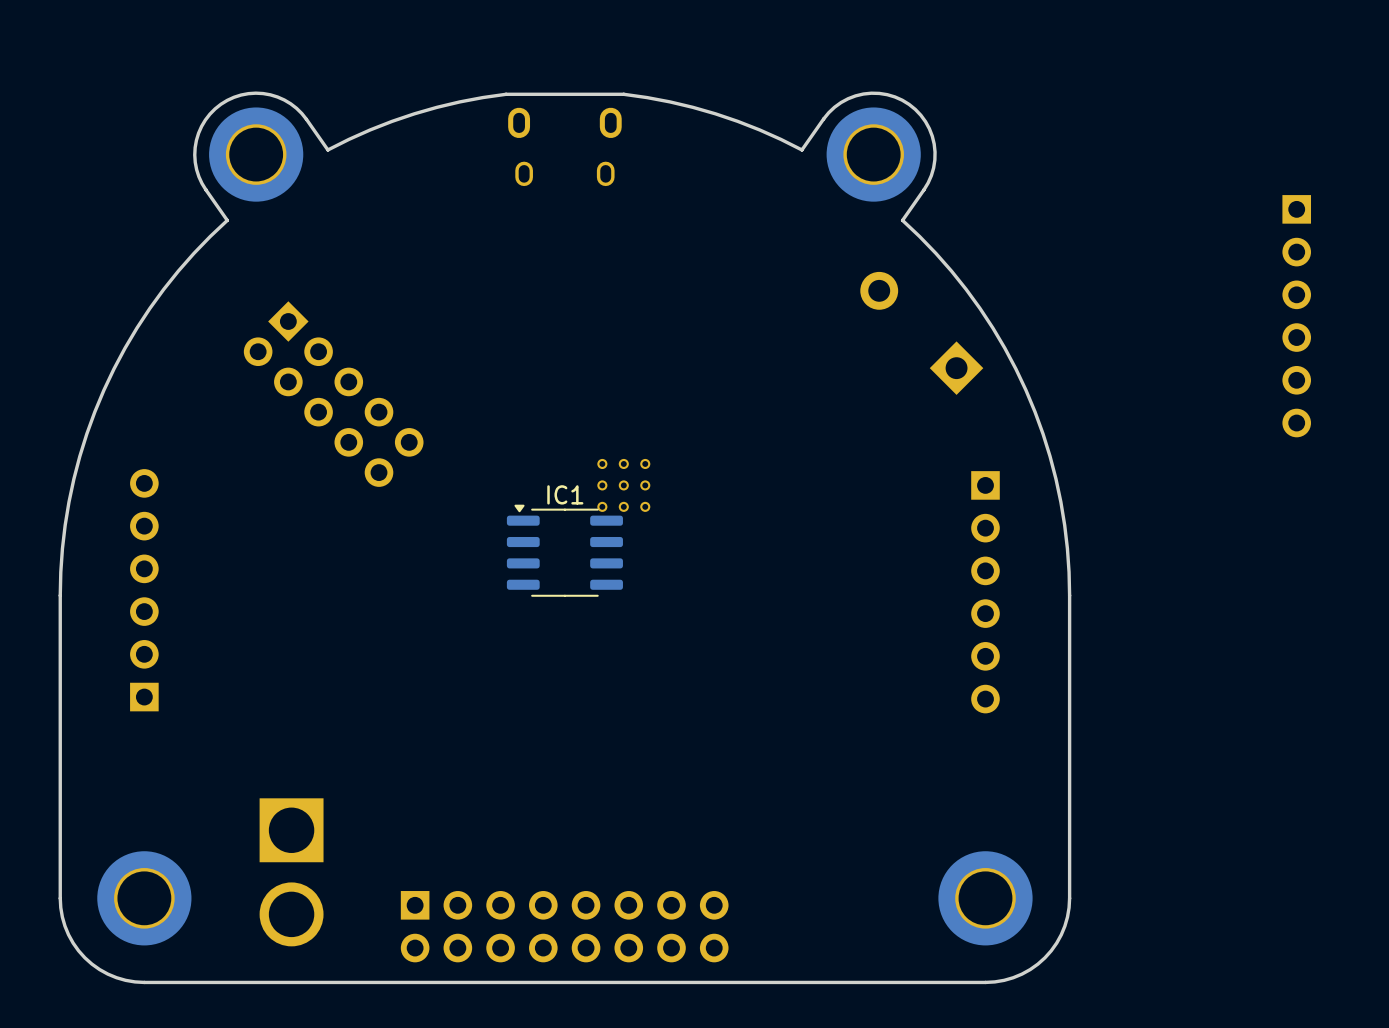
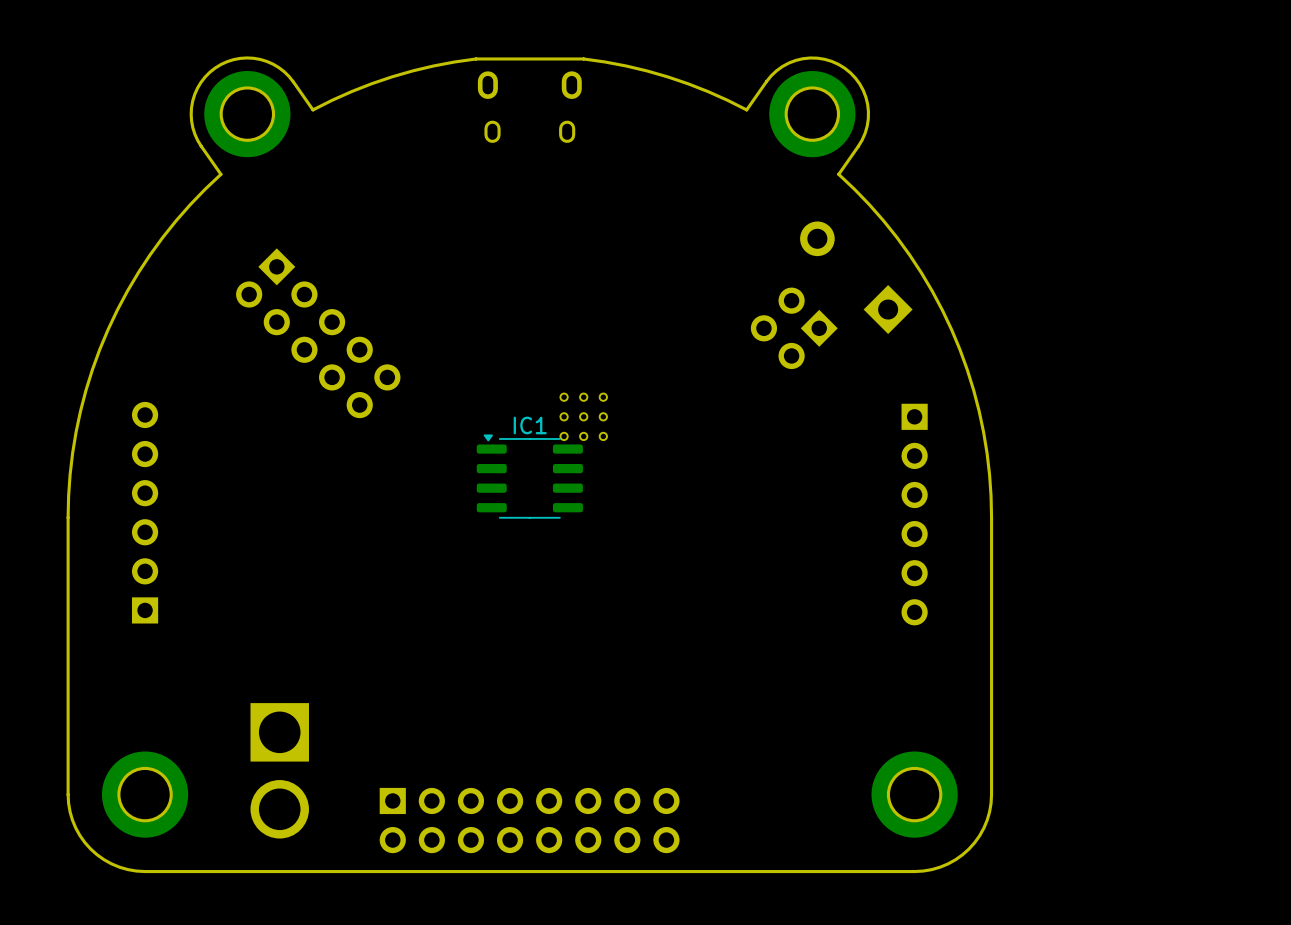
part: (1296, 316) -> none
part: none -> (794, 328)

